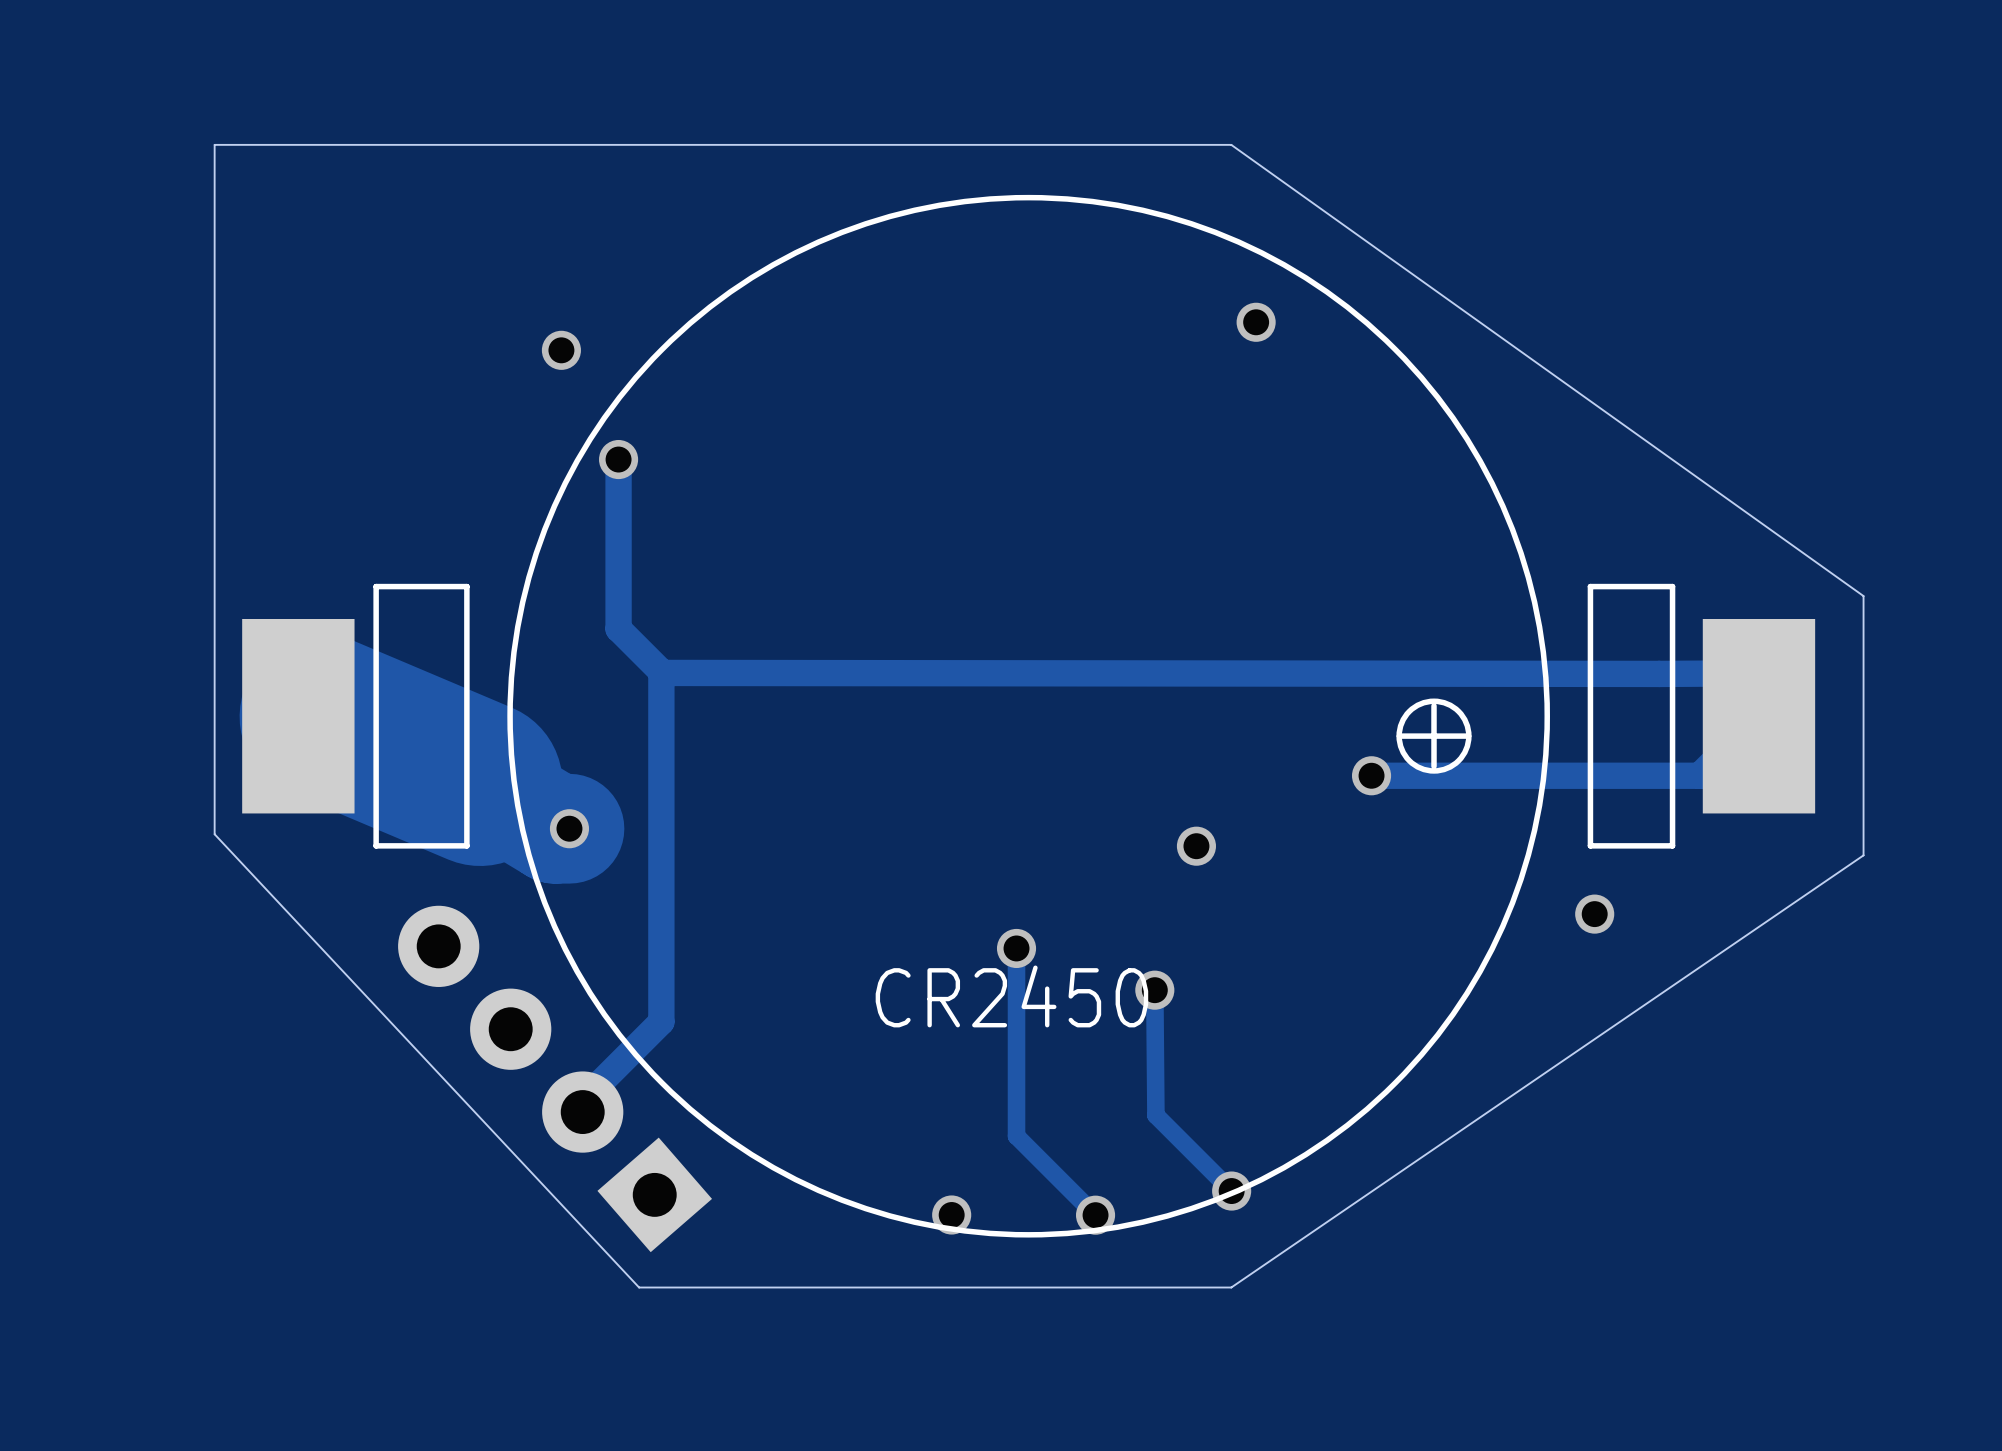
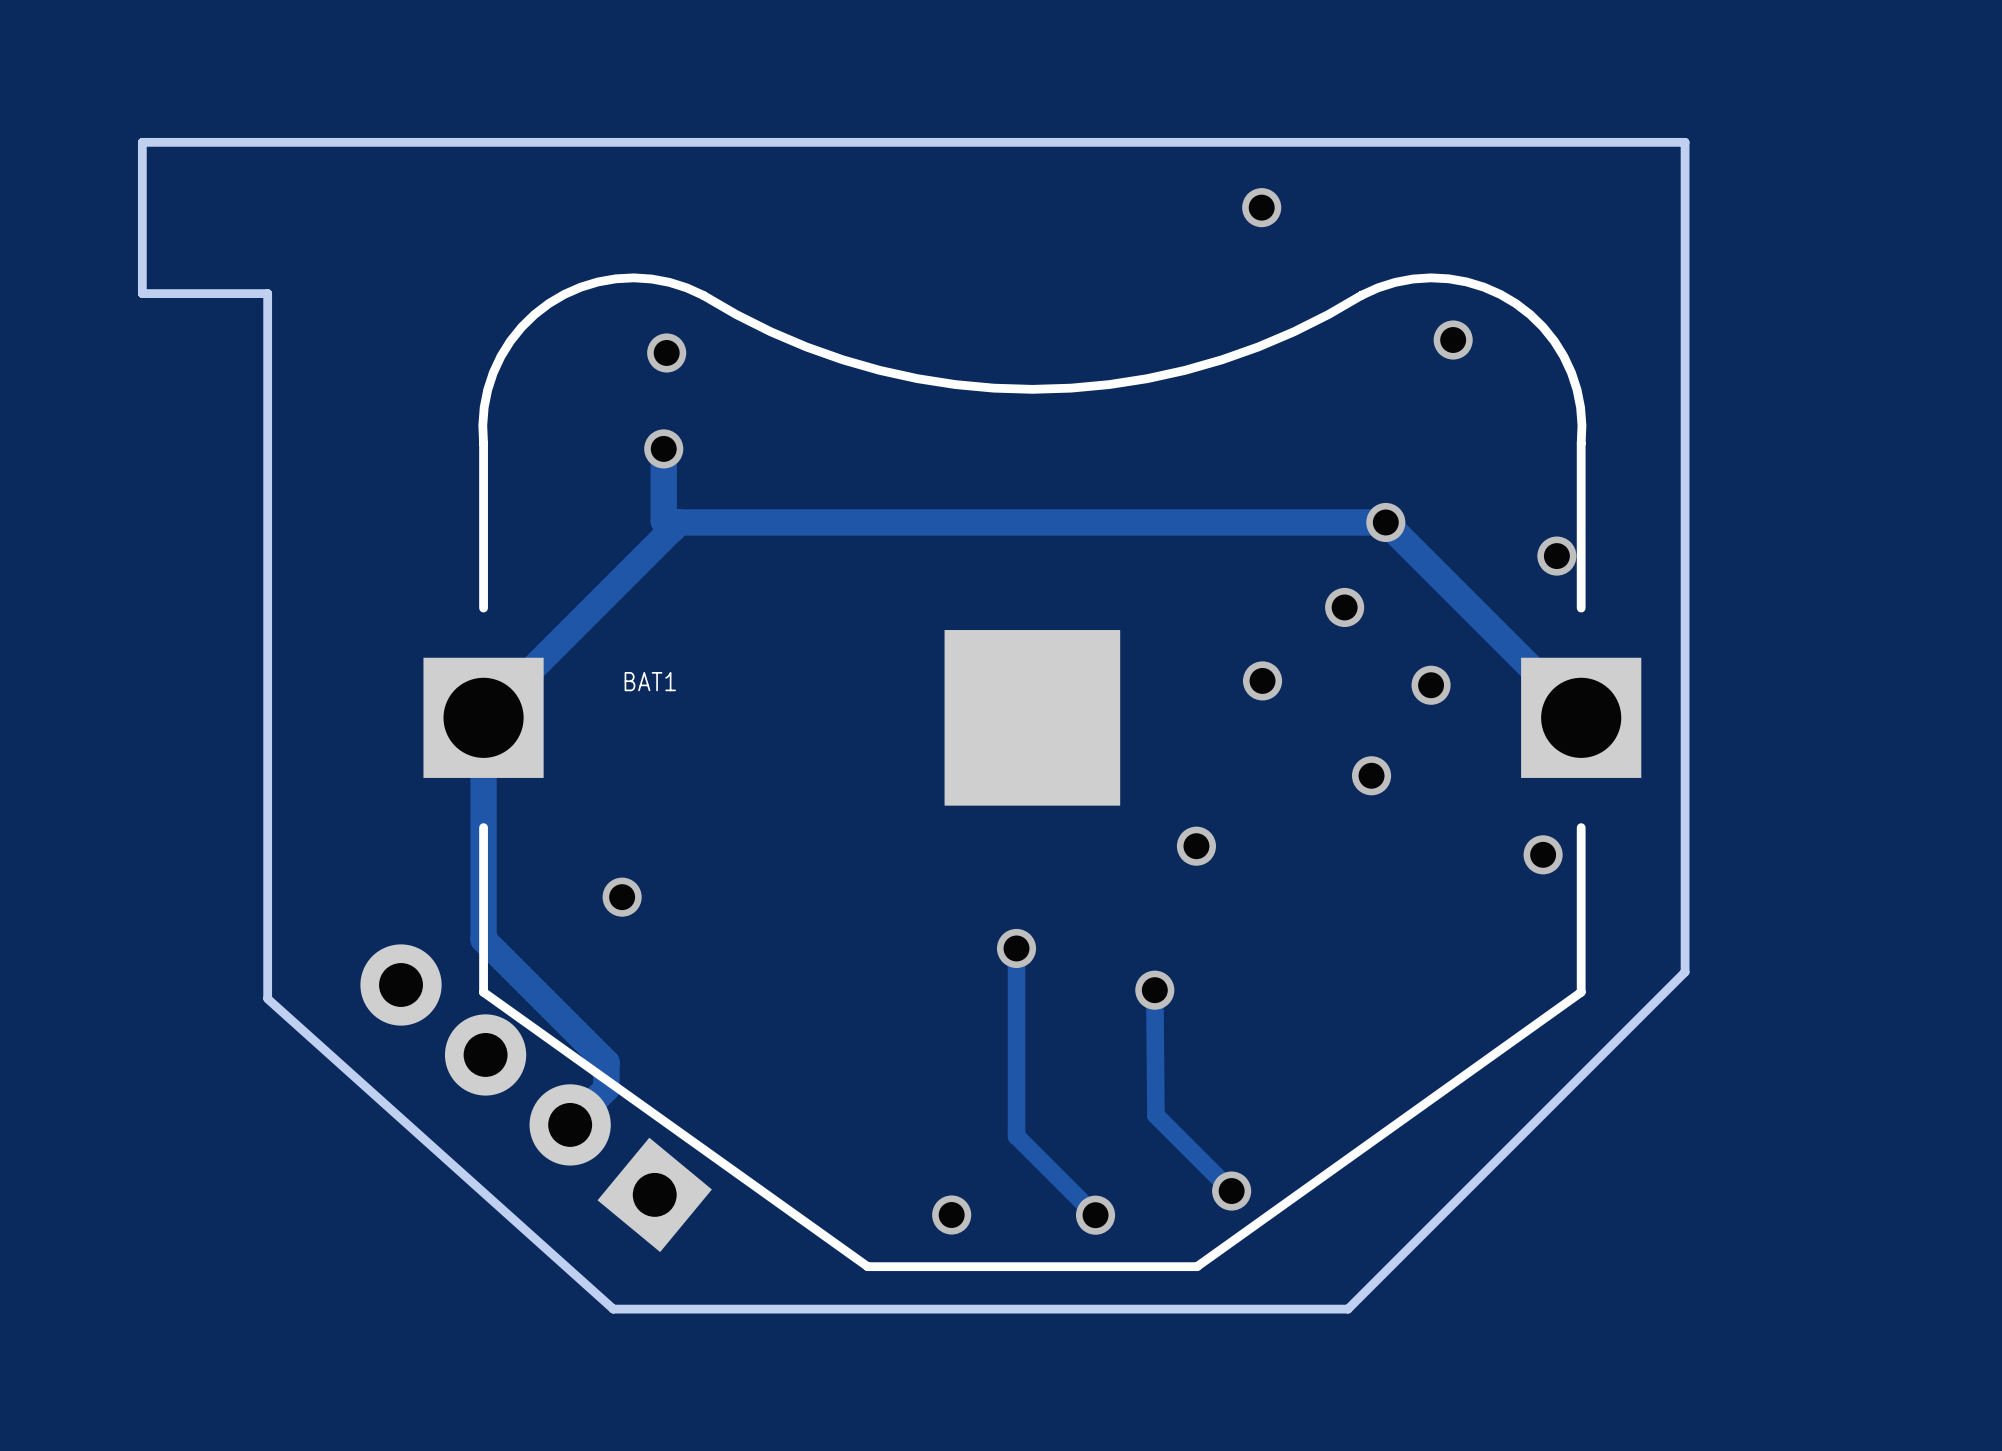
board edge: (1231, 144) (214, 144) (214, 834) (639, 1287) (1231, 1287) (1863, 855) (1863, 596) (1231, 144) -> (267, 997) (267, 293) (142, 293) (142, 142) (1685, 142) (1685, 972) (1348, 1309) (613, 1309) (267, 998)
via: none -> (1261, 207)
via: (1256, 322) -> none
via: none -> (1453, 340)
via: (561, 350) -> none
via: none -> (666, 352)
track: none -> (663, 448) (663, 521) (672, 529)
track: (618, 459) (618, 628) (662, 672) -> none
via position: (618, 459) -> (663, 448)
via: none -> (1385, 522)
via: none -> (1556, 556)
via: none -> (1344, 607)
track: (662, 672) (1749, 673) (1775, 699) -> none
track: (662, 672) (661, 1021) (582, 1100) -> none
via: none -> (1262, 680)
via: none -> (1431, 685)
track: (298, 716) (321, 716) (480, 783) (554, 828) (569, 828) -> none
CR2450: (1028, 716) -> none
track: (1758, 716) (1699, 775) (1371, 775) -> none
track: none -> (1581, 717) (1385, 522) (678, 522) (483, 717) (483, 939) (606, 1062) (606, 1088) (570, 1124) (582, 1112)
BAT1: none -> (1032, 772)
via position: (569, 828) -> (622, 897)
via position: (1594, 914) -> (1543, 854)
part rotation: 0° (555, 1078) -> 9.4° counterclockwise (536, 1098)

